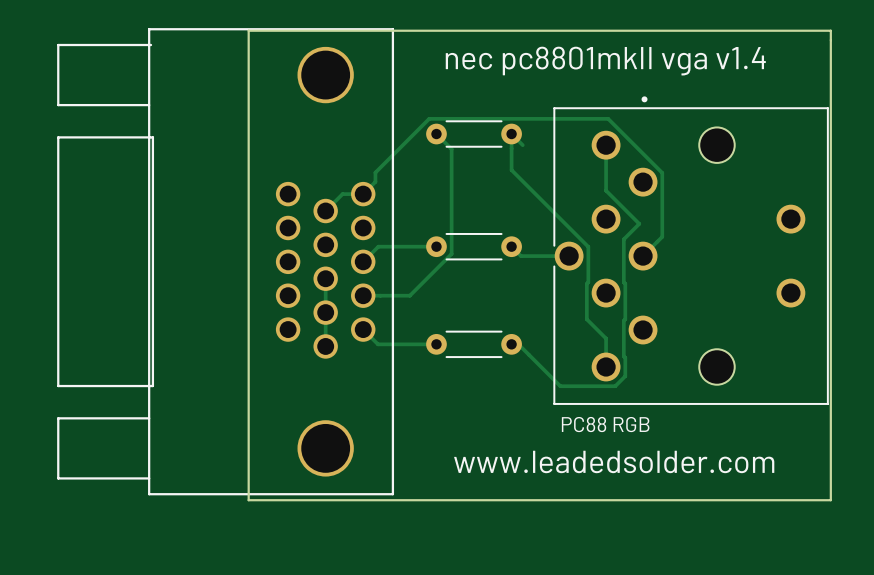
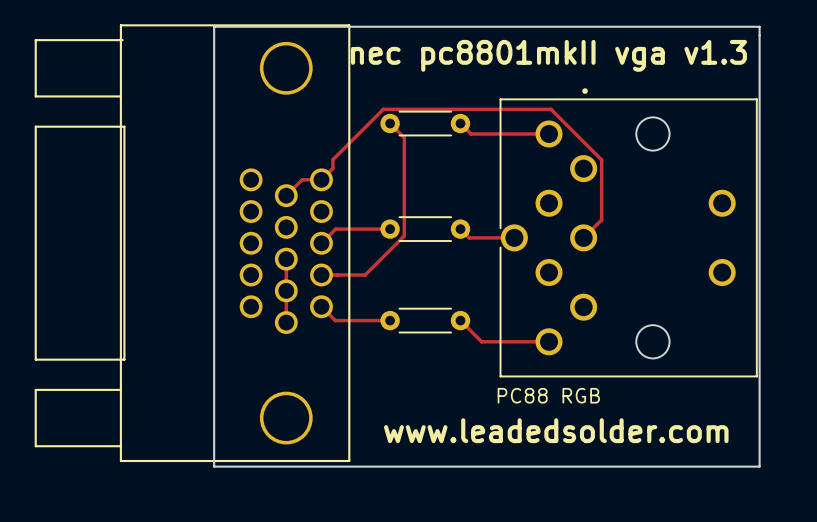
text: nec pc8801mkII vga v1.4 (605, 61) -> nec pc8801mkII vga v1.3 (548, 55)
track: (511, 134) (511, 170) (588, 246) (586, 319) (606, 338) (606, 366) -> (460, 320) (481, 341) (549, 341)
track: (606, 145) (606, 190) (639, 223) (623, 239) (625, 376) (615, 386) (560, 386) (518, 344) -> (549, 133) (470, 133)

